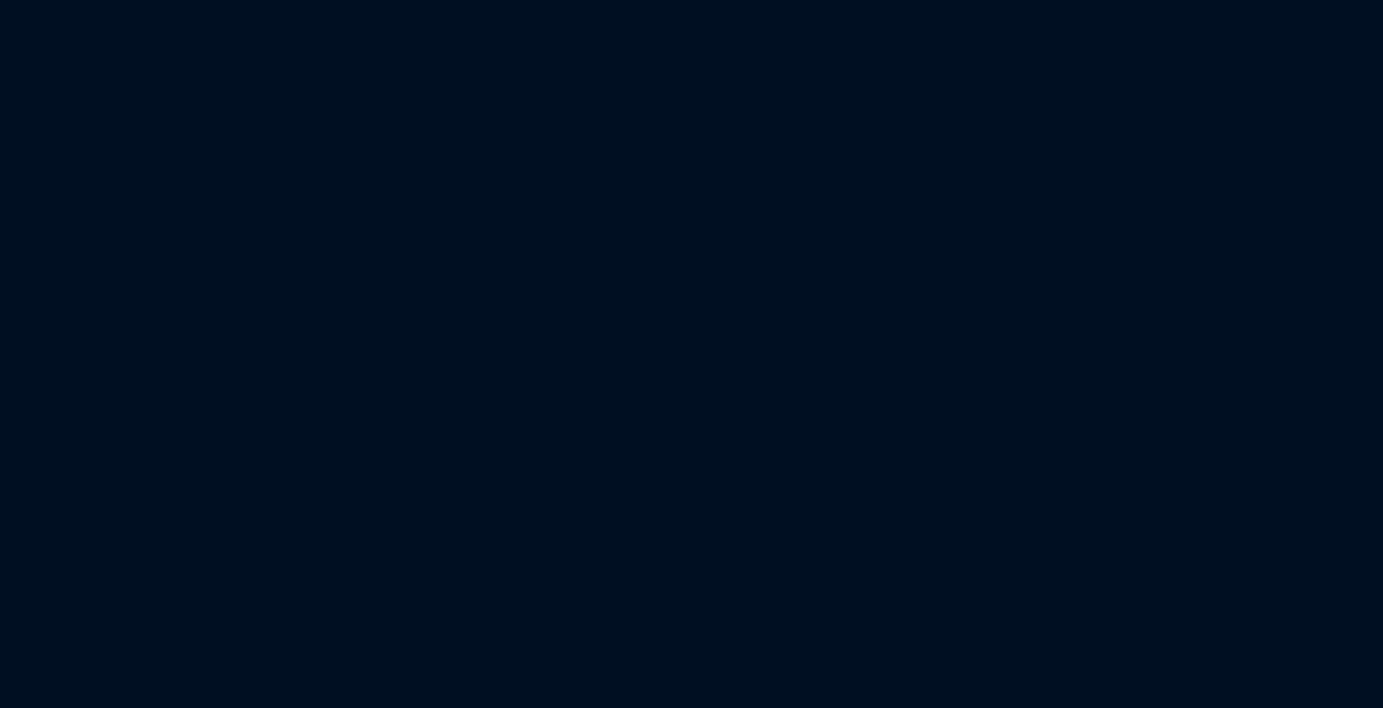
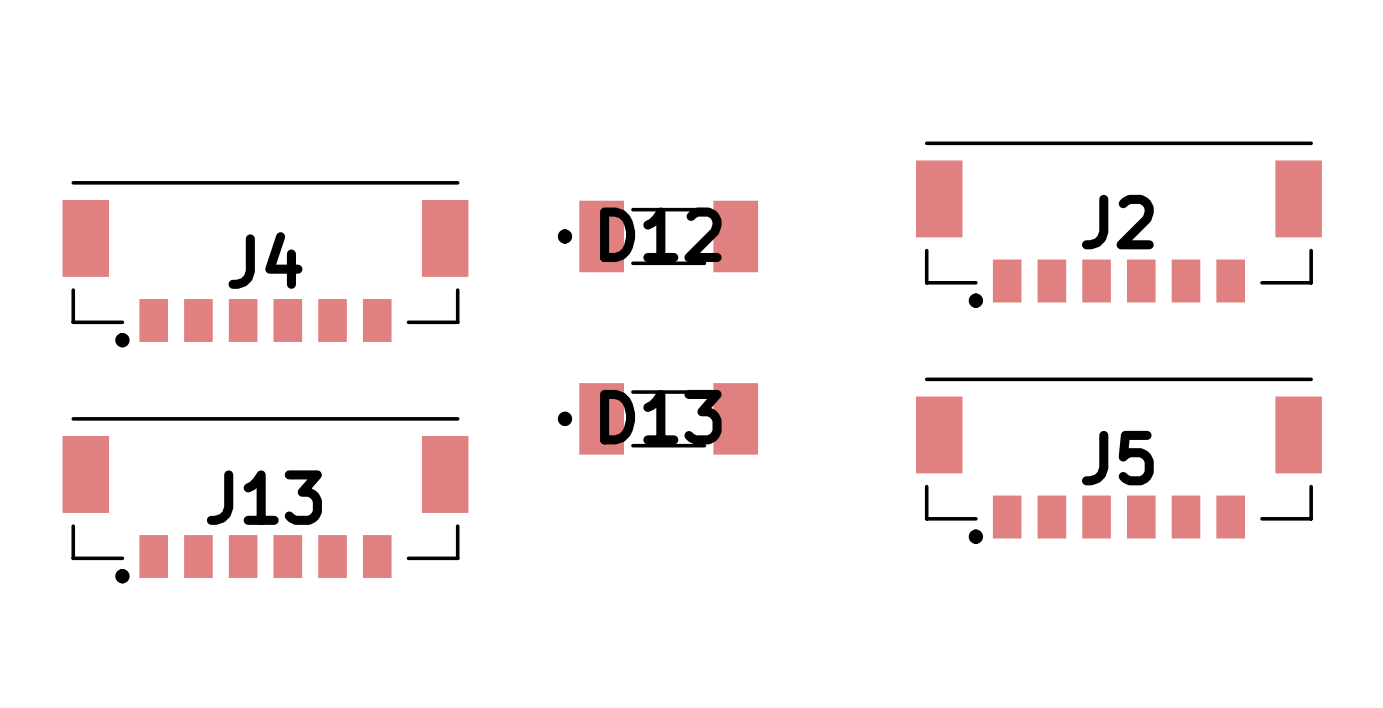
J2: none -> (1118, 224)
D12: none -> (657, 236)
J4: none -> (265, 264)
D13: none -> (657, 418)
J5: none -> (1118, 460)
J13: none -> (265, 500)

